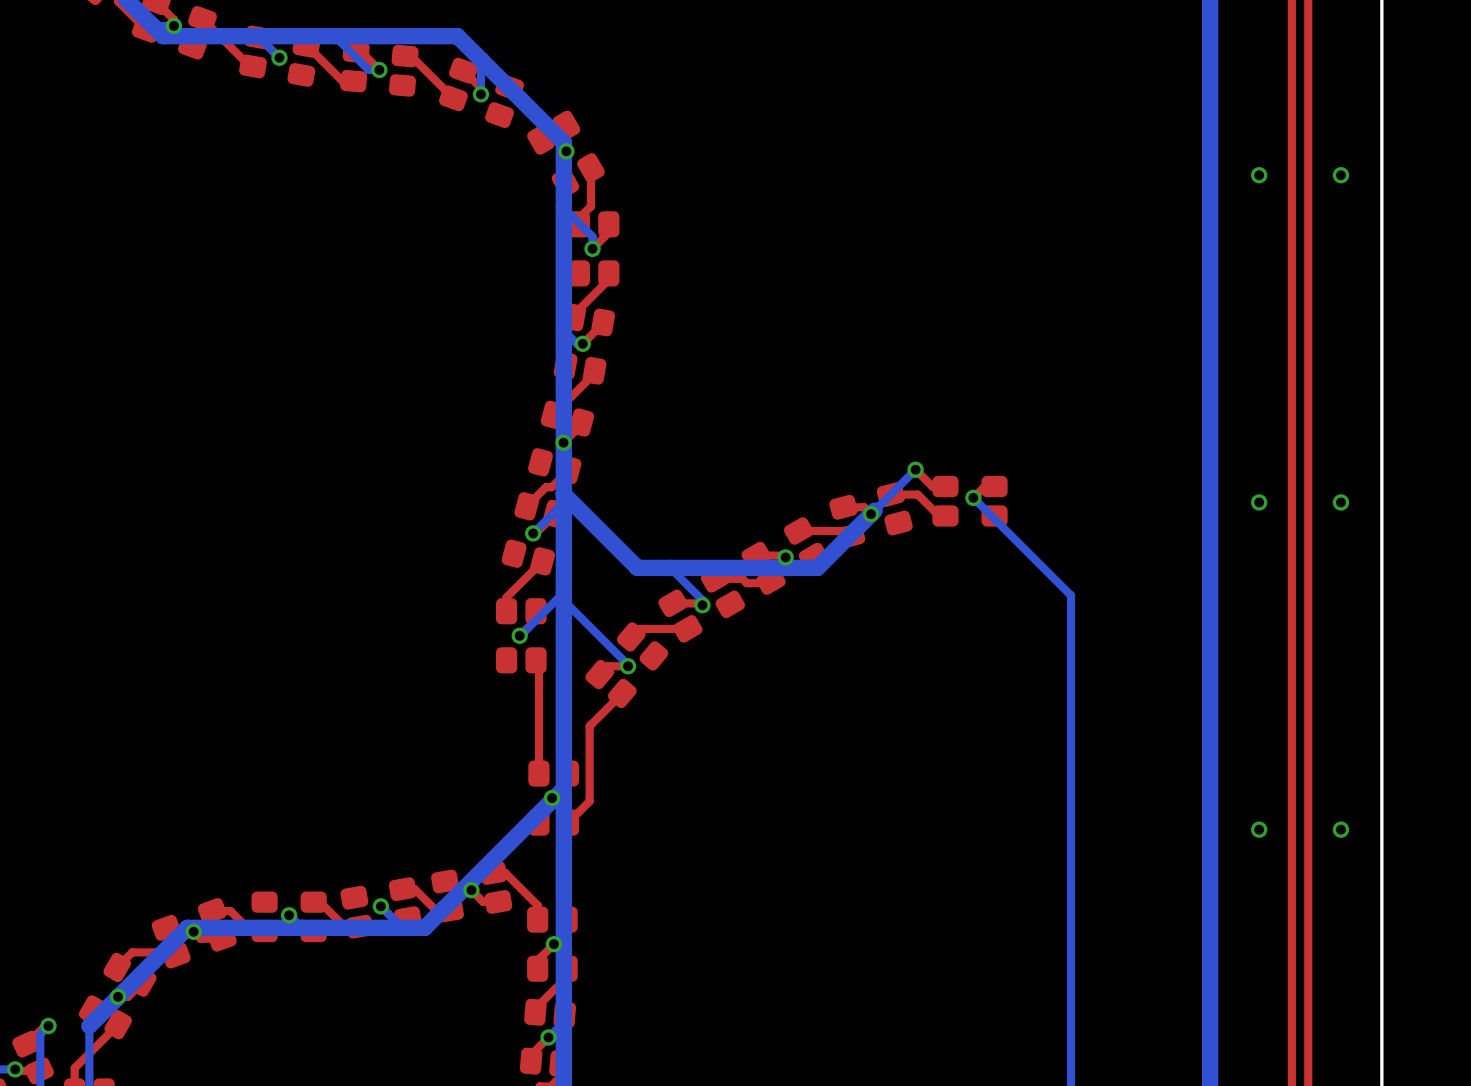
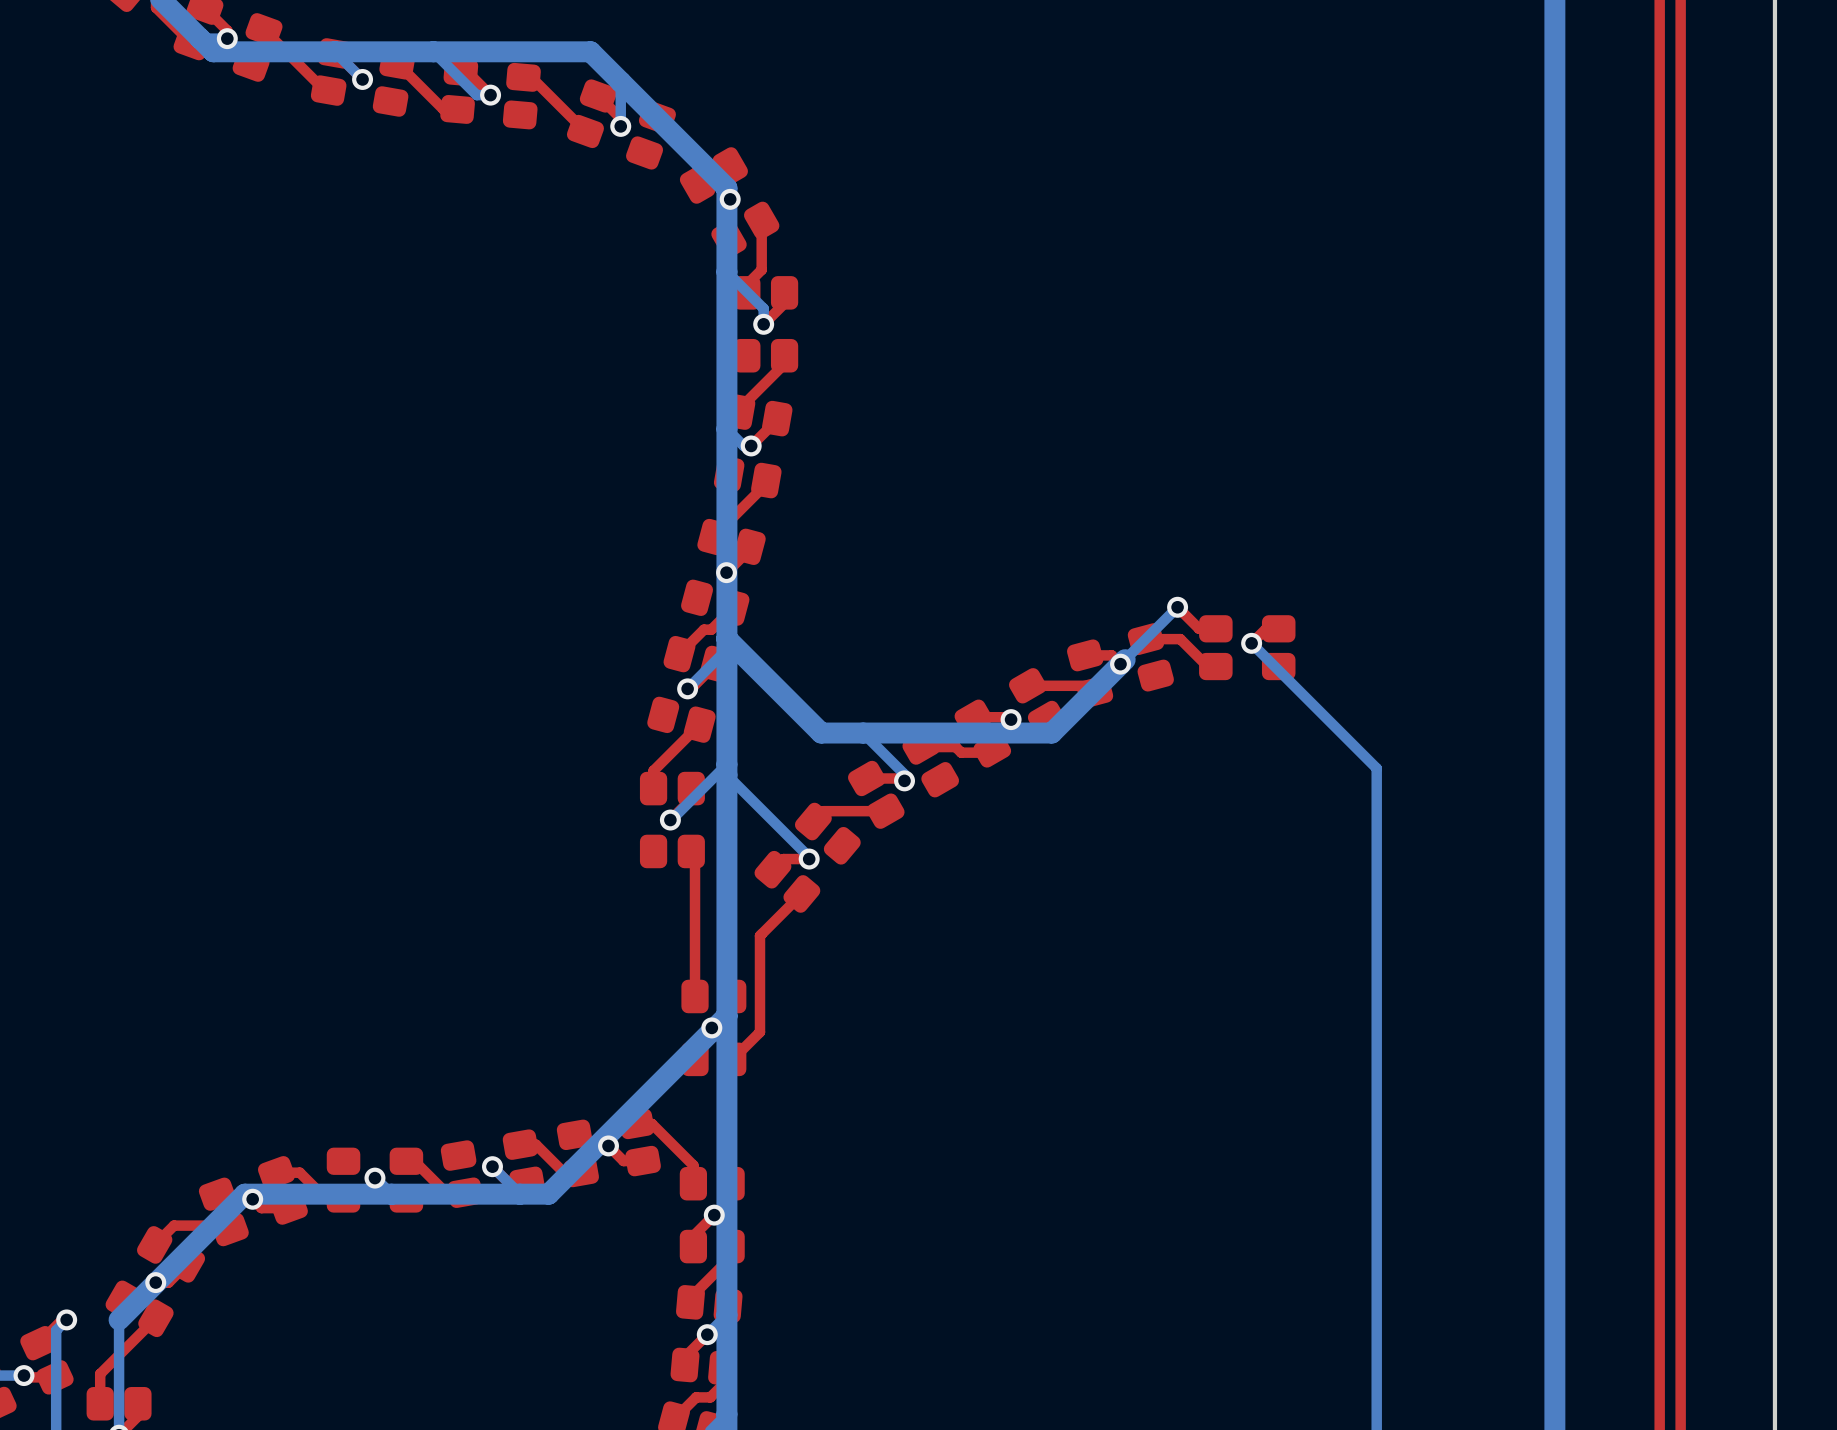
via: (1259, 175) -> none
via: (1340, 175) -> none
via: (1259, 502) -> none
via: (1340, 502) -> none
via: (1259, 829) -> none
via: (1340, 829) -> none

